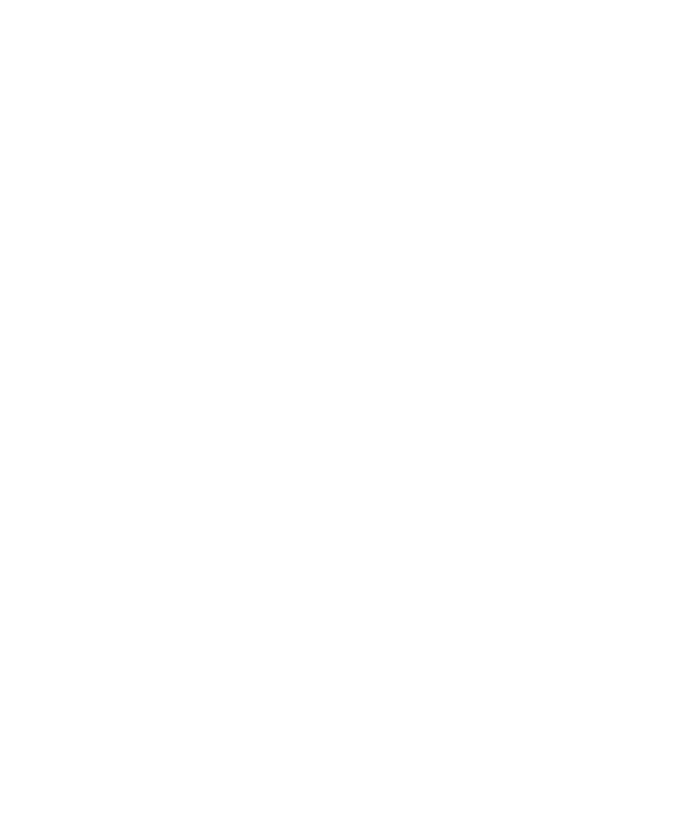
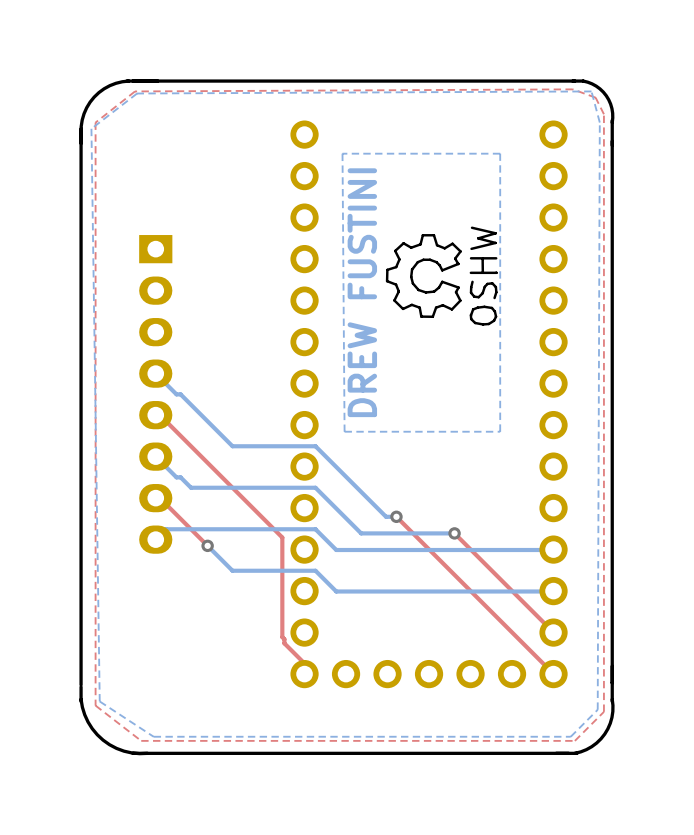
board edge: none -> (126, 81) (583, 81) (596, 86) (606, 95) (611, 108) (612, 122)
board edge: none -> (128, 81) (109, 85) (94, 97) (84, 113) (81, 132)
top zone outline: none -> (572, 89) (595, 97) (603, 114) (603, 711) (574, 740) (141, 740) (95, 705) (95, 122) (135, 91) (572, 89)
bottom zone outline: none -> (591, 91) (137, 93) (91, 128) (99, 701) (153, 736) (570, 736) (597, 709) (599, 122) (591, 91)
board edge: none -> (612, 120) (612, 701)
board edge: none -> (81, 128) (81, 684)
bottom zone outline: none -> (500, 153) (342, 153) (344, 431) (500, 431) (500, 153)
drawing: none -> [385, 226, 498, 326]
text: none -> DREW FUSTINI (362, 292)
bottom track: none -> (155, 373) (176, 394) (180, 394) (232, 446) (315, 446) (386, 516) (396, 516)
part: none -> (155, 394)
part: none -> (429, 404)
top track: none -> (155, 415) (159, 415) (282, 537) (282, 637) (284, 643) (305, 664) (304, 674)
bottom track: none -> (155, 456) (176, 477) (180, 477) (191, 487) (315, 487) (361, 533) (454, 533)
top track: none -> (155, 498) (159, 498) (207, 545)
top track: none -> (396, 516) (553, 674)
via: none -> (396, 516)
top track: none -> (454, 533) (553, 632)
via: none -> (454, 533)
bottom track: none -> (155, 539) (166, 529) (315, 529) (336, 550) (553, 549)
bottom track: none -> (207, 545) (232, 570) (315, 570) (336, 591) (553, 591)
via: none -> (207, 545)
board edge: none -> (81, 686) (81, 701)
board edge: none -> (81, 699) (88, 721) (103, 740) (123, 751) (147, 753)
board edge: none -> (612, 699) (611, 717) (604, 734) (591, 746) (574, 753)
board edge: none -> (576, 753) (132, 753)

